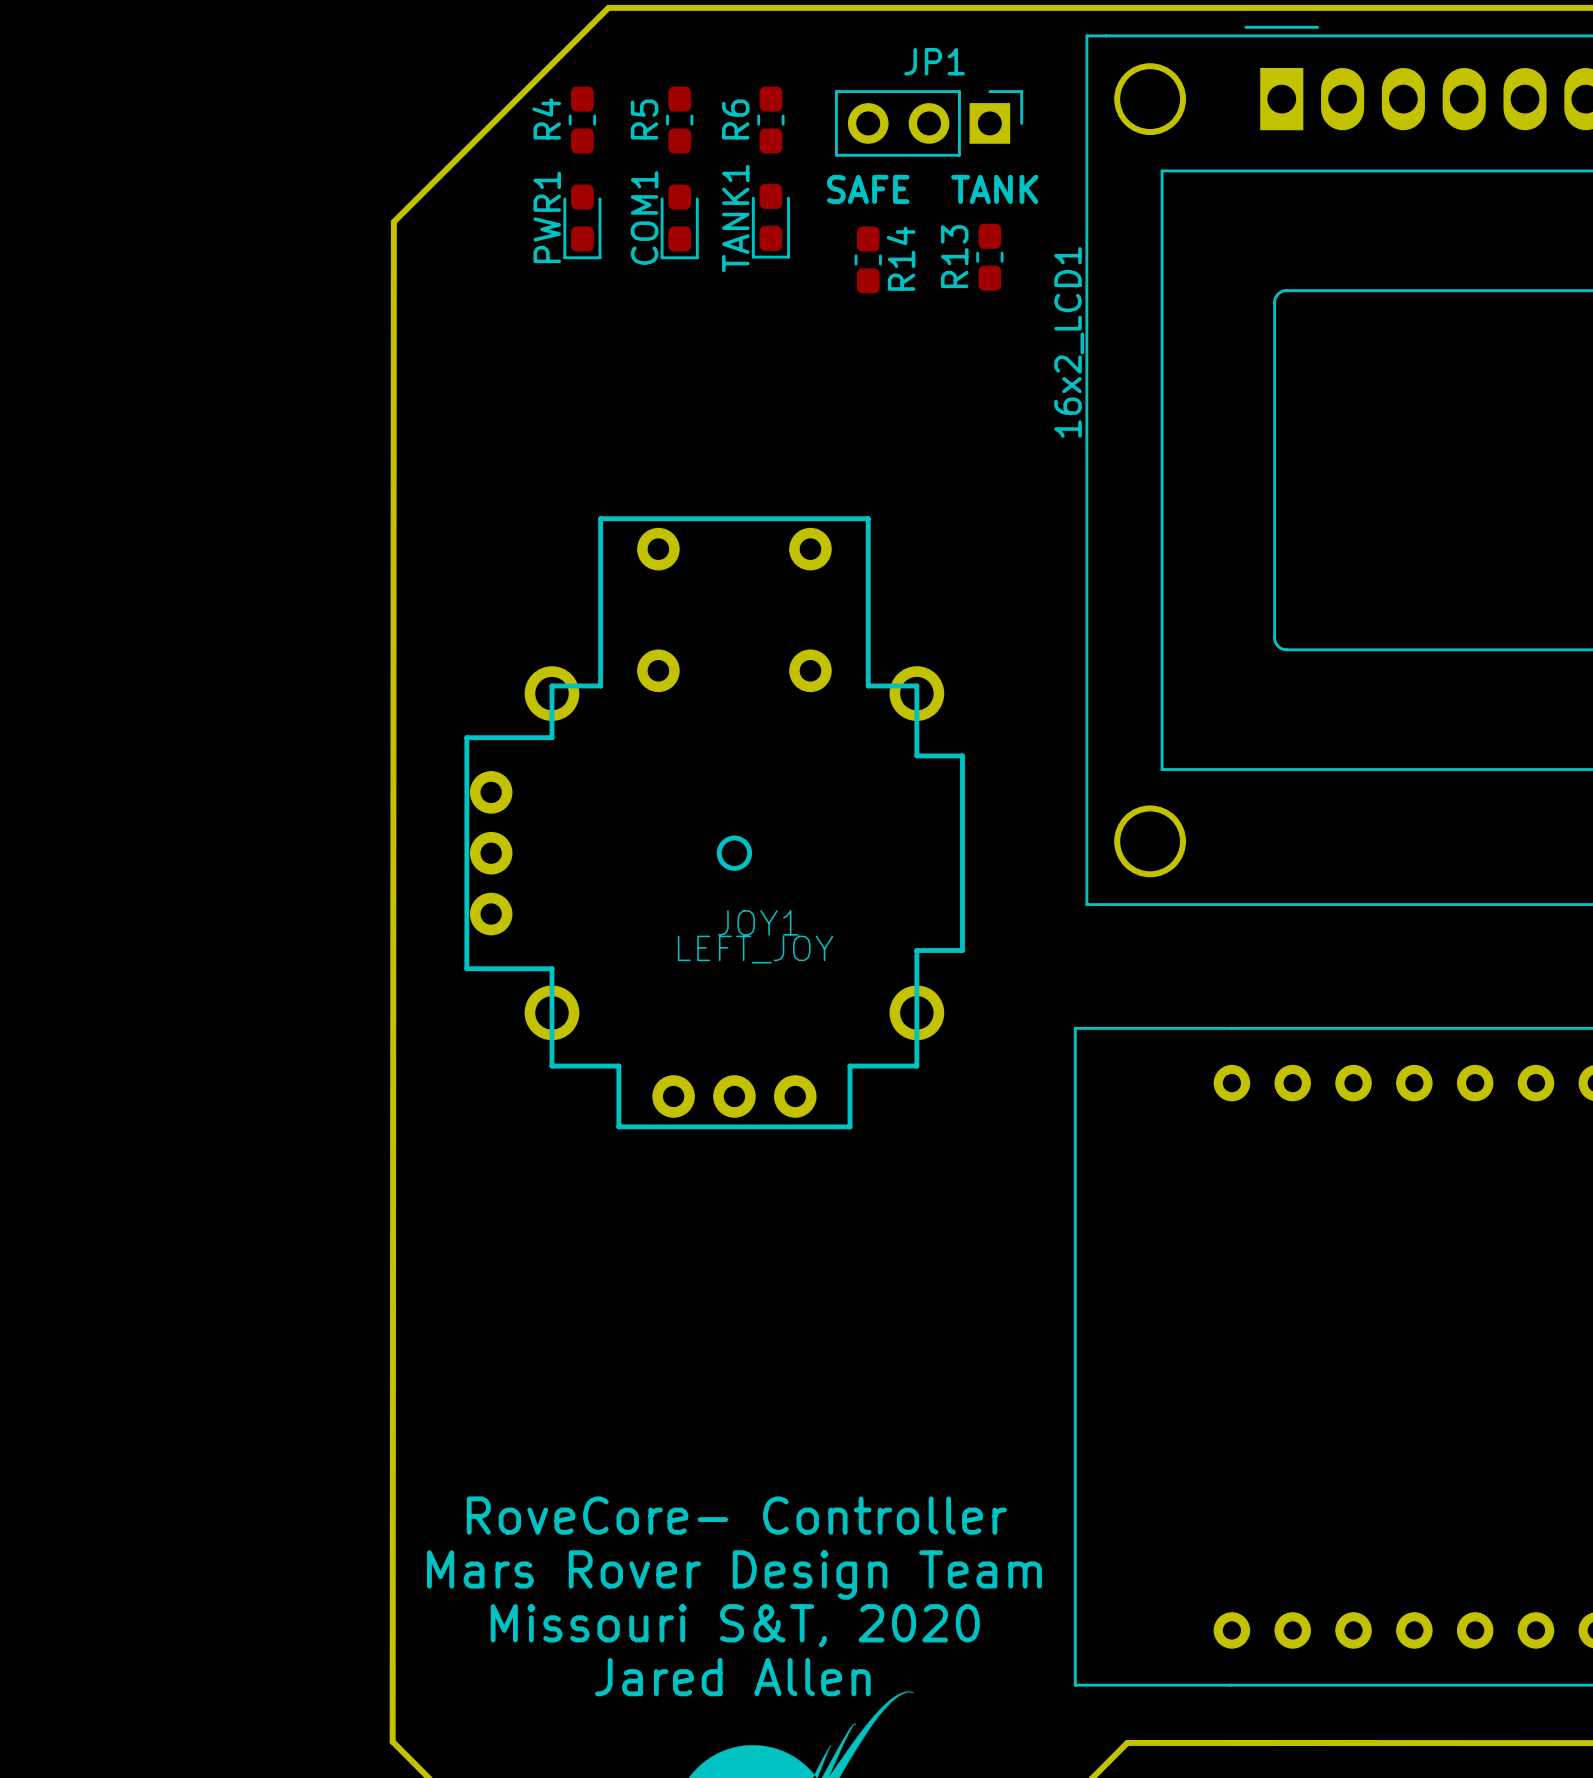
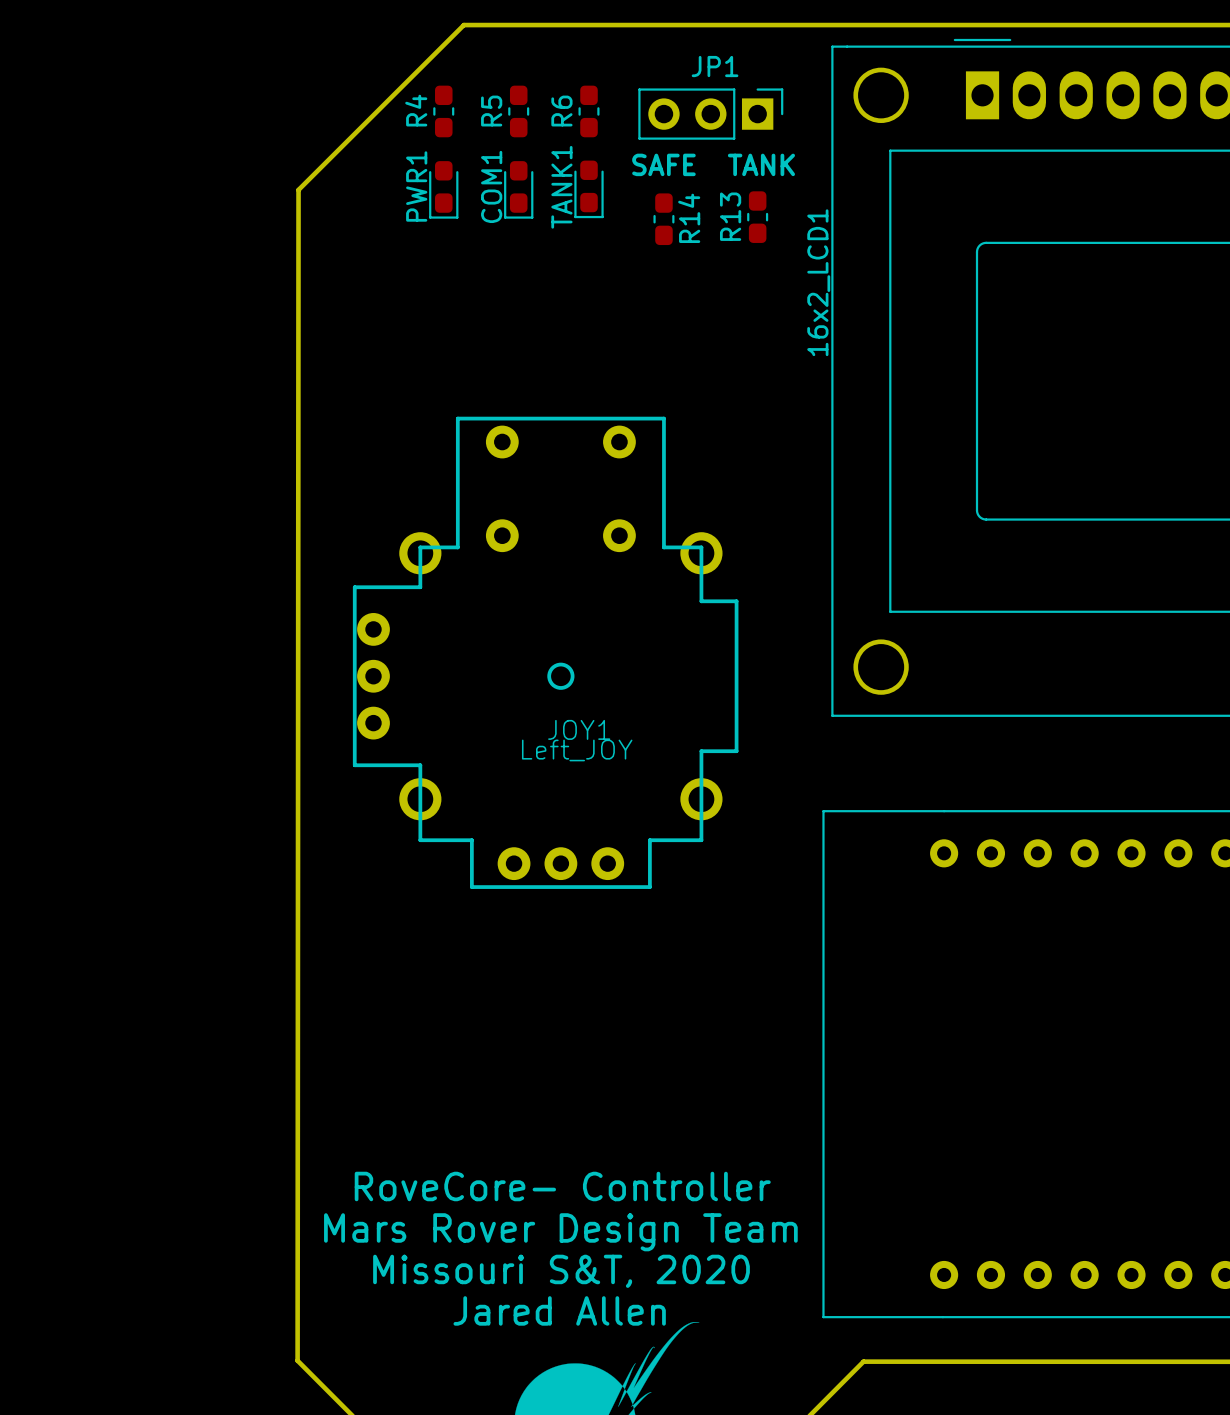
JOY1 value: LEFT_JOY (755, 949) -> Left_JOY (577, 750)

